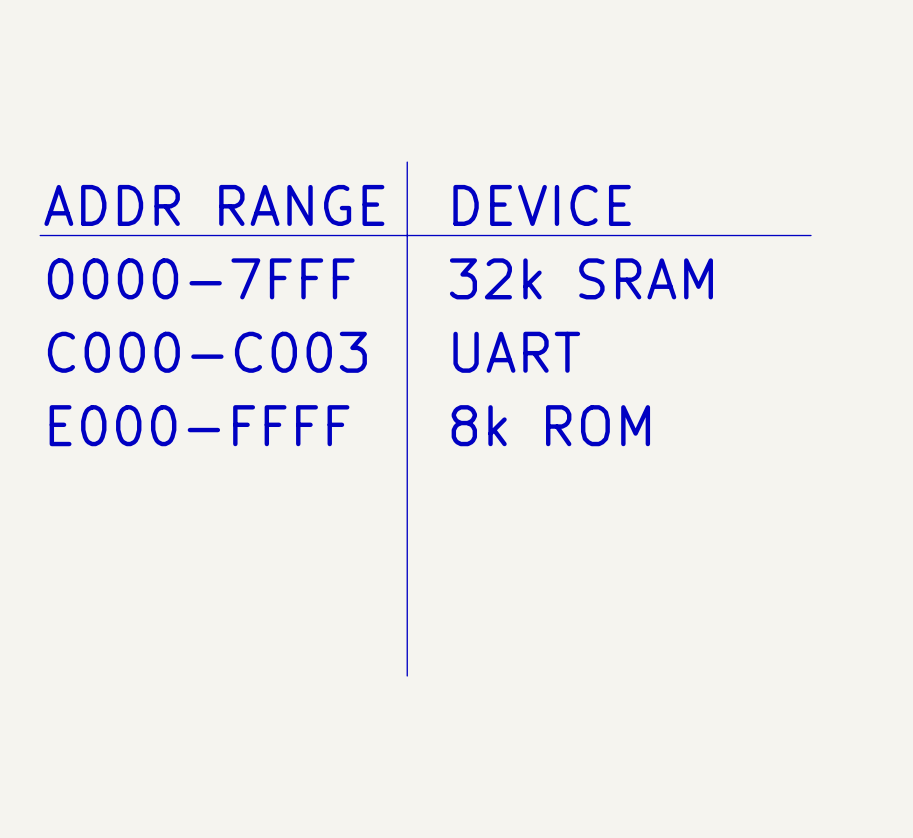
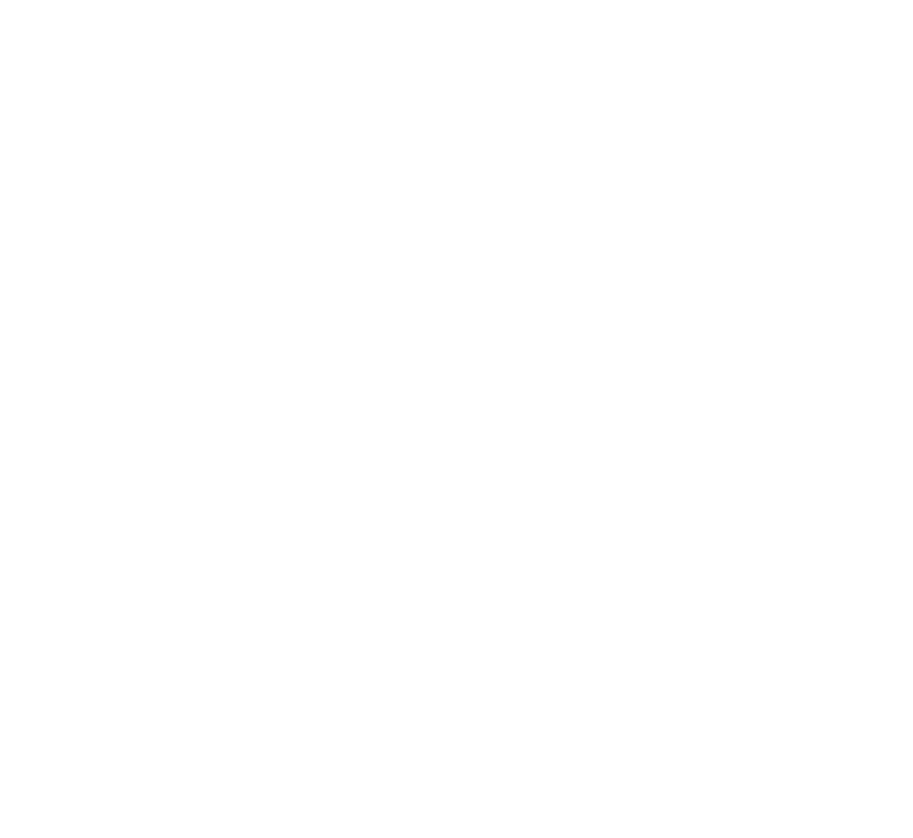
line: (407, 162) (407, 675) -> none
text: ADDR RANGE (214, 205) -> none
text: DEVICE (542, 205) -> none
line: (40, 235) (810, 235) -> none
text: 0000-7FFF (201, 278) -> none
text: 32k SRAM (581, 278) -> none
text: C000-C003 (207, 352) -> none
text: UART (516, 352) -> none
text: E000-FFFF (199, 425) -> none
text: 8k ROM (550, 425) -> none

